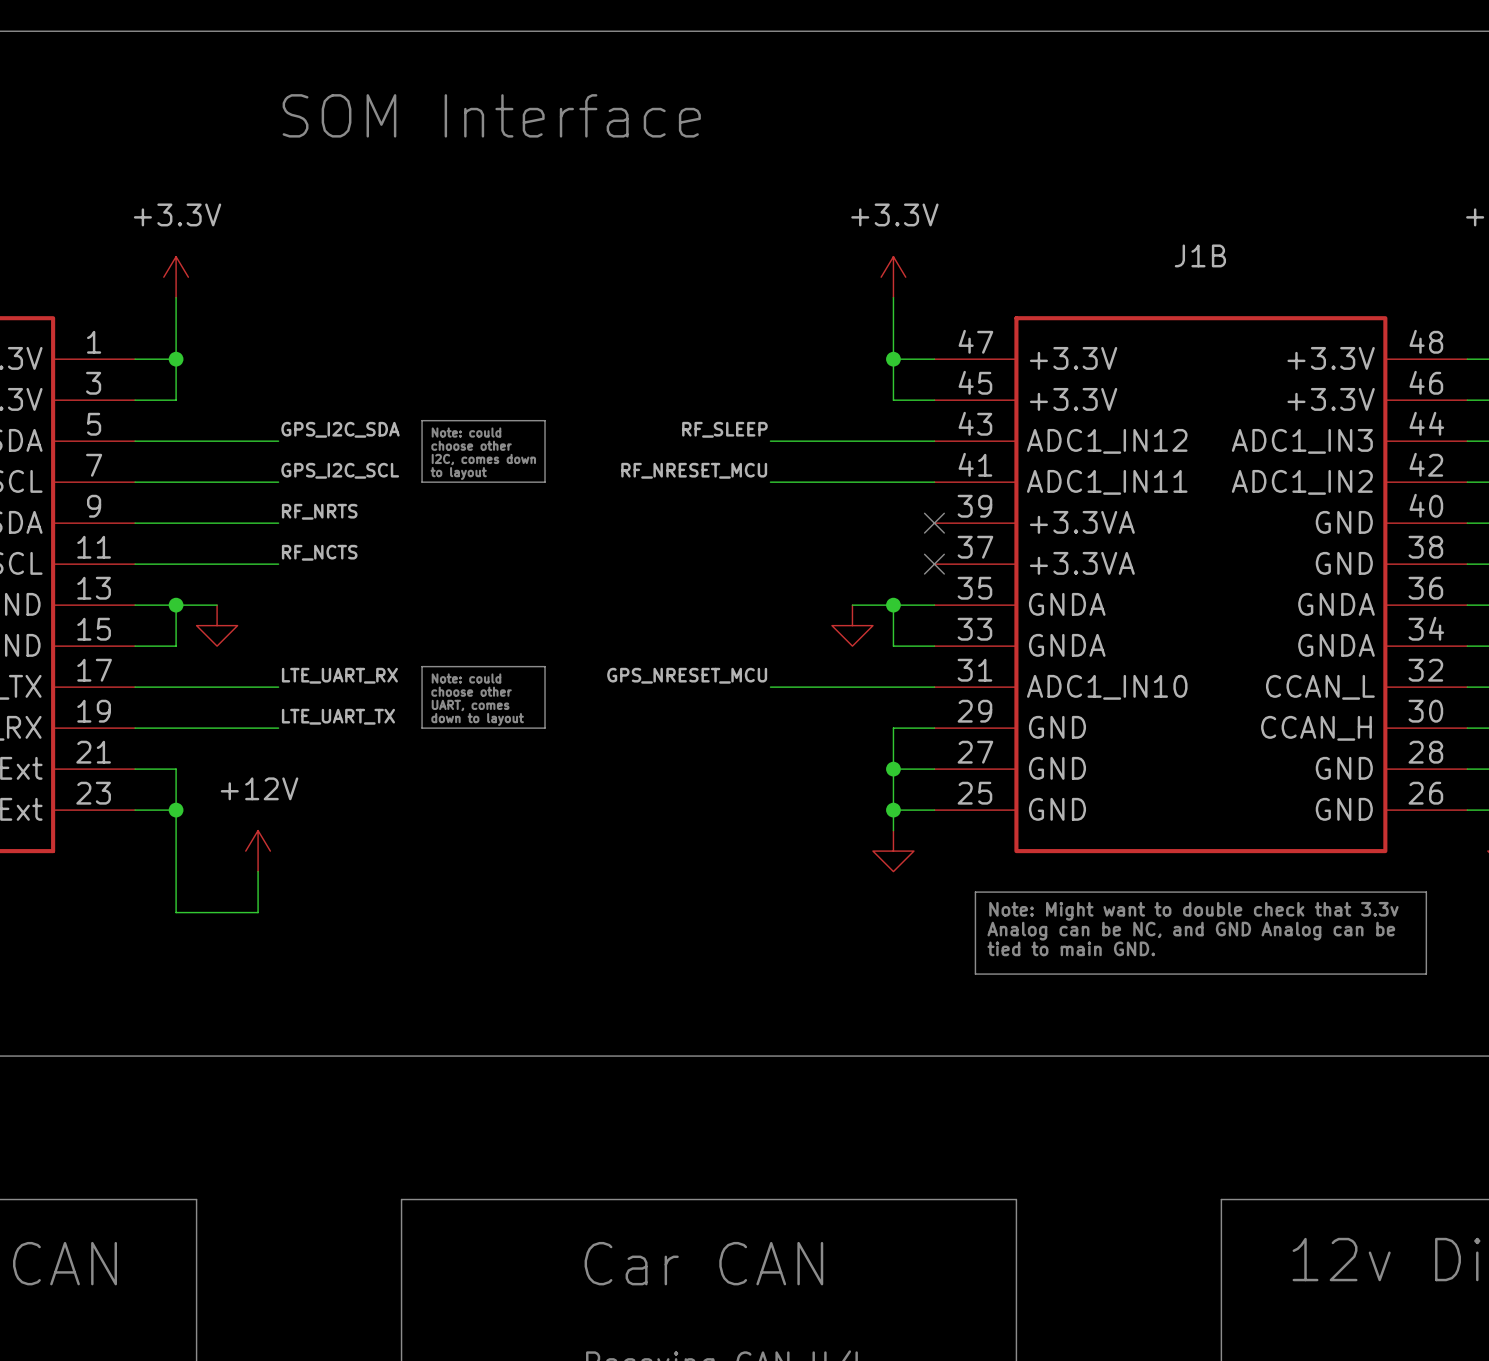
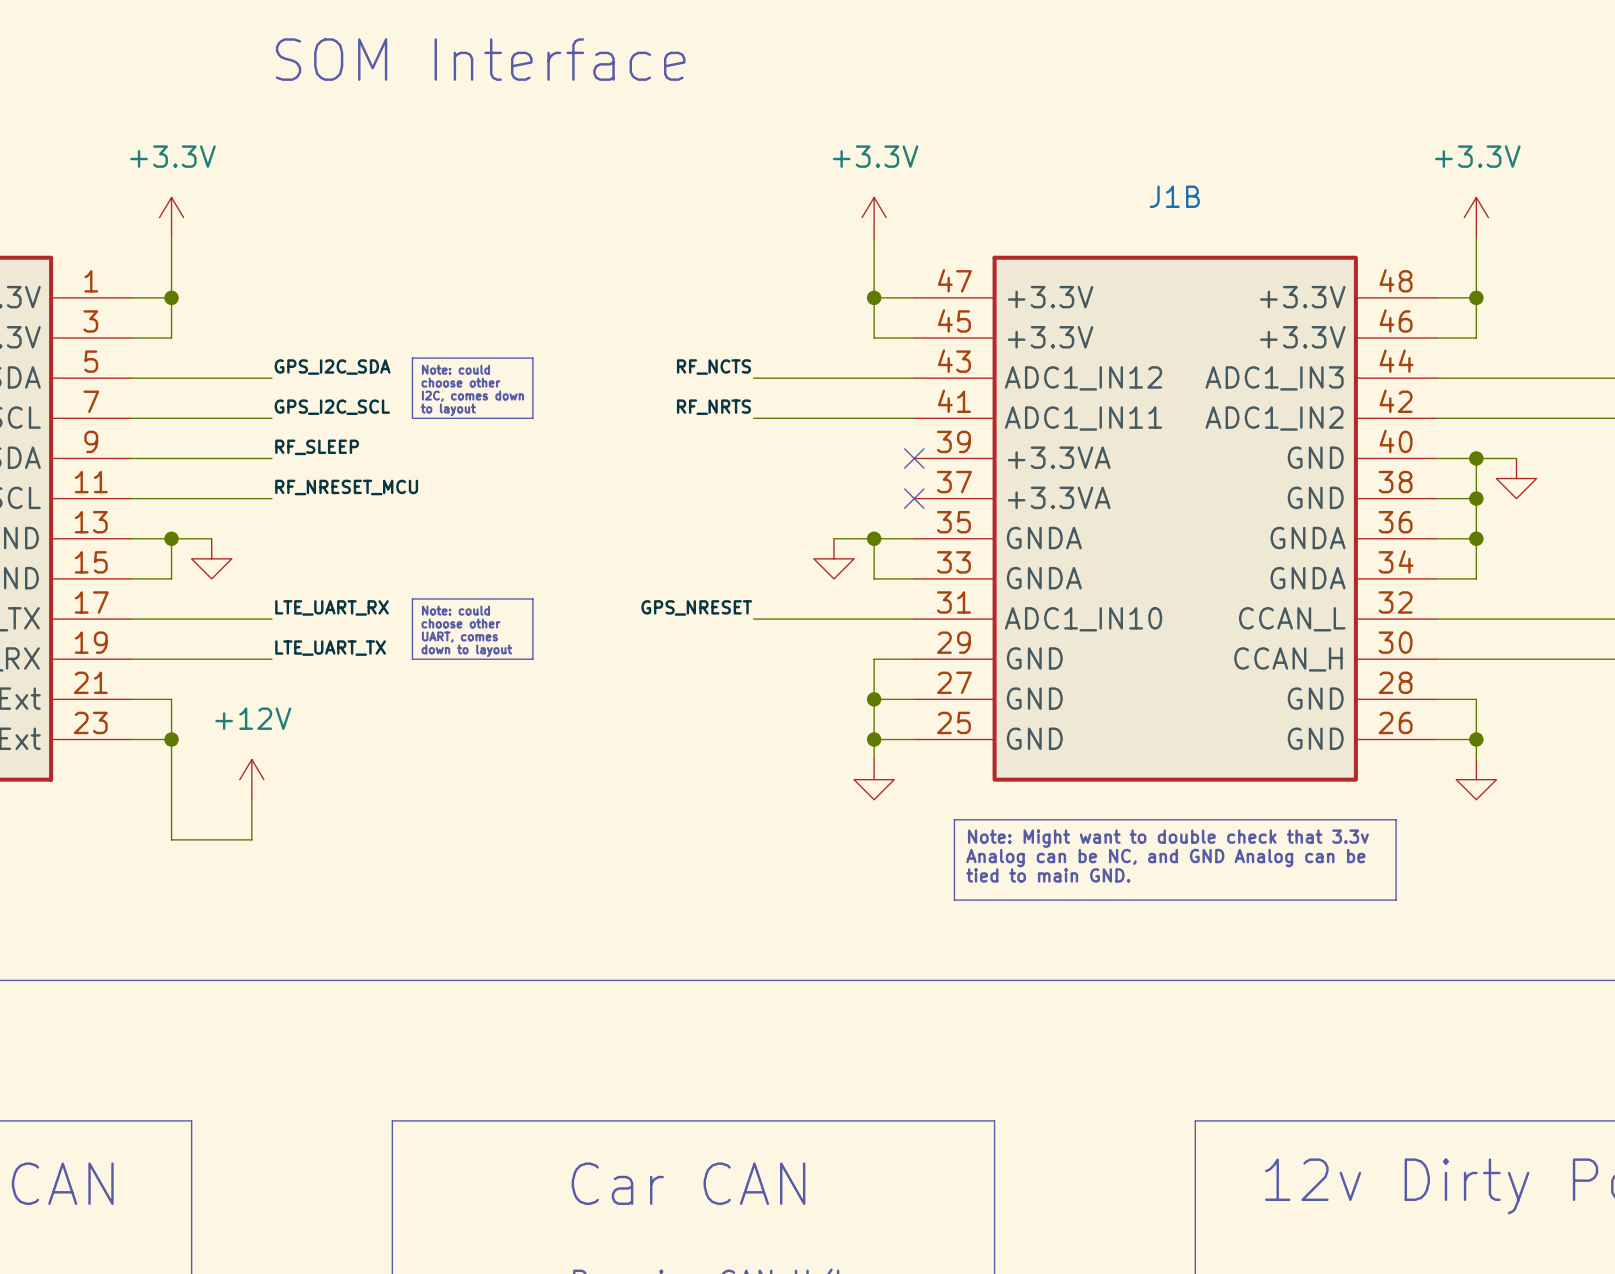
label: RF_SLEEP (724, 429) -> RF_NCTS (713, 367)
label: RF_NRESET_MCU (694, 470) -> RF_NRTS (713, 407)
label: RF_NRTS (319, 511) -> RF_SLEEP (317, 447)
label: RF_NCTS (319, 552) -> RF_NRESET_MCU (346, 487)
label: GPS_NRESET_MCU (687, 675) -> GPS_NRESET (696, 607)

